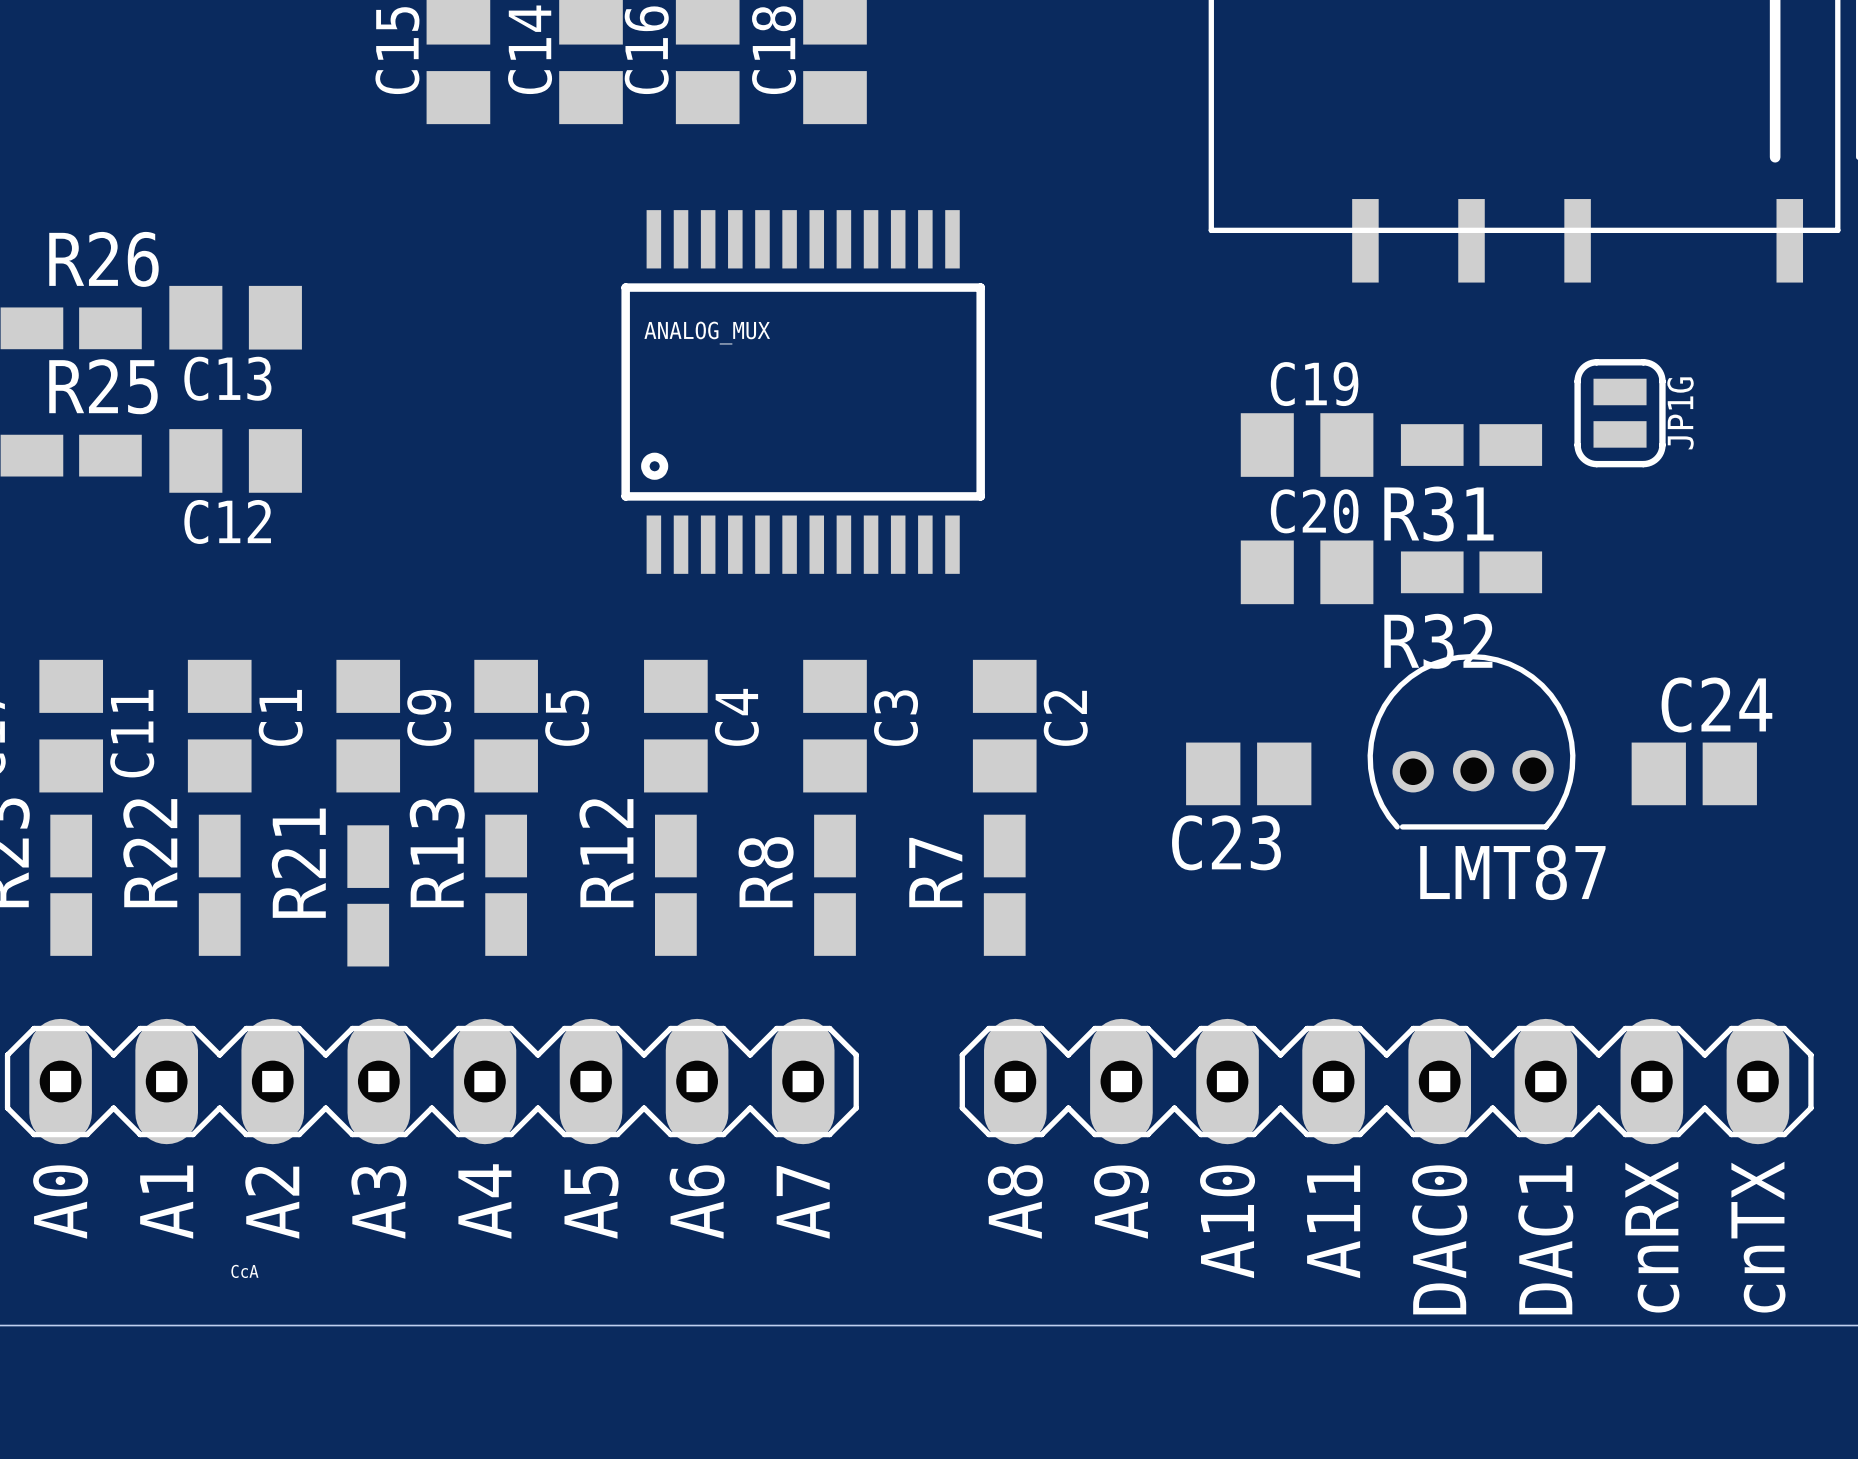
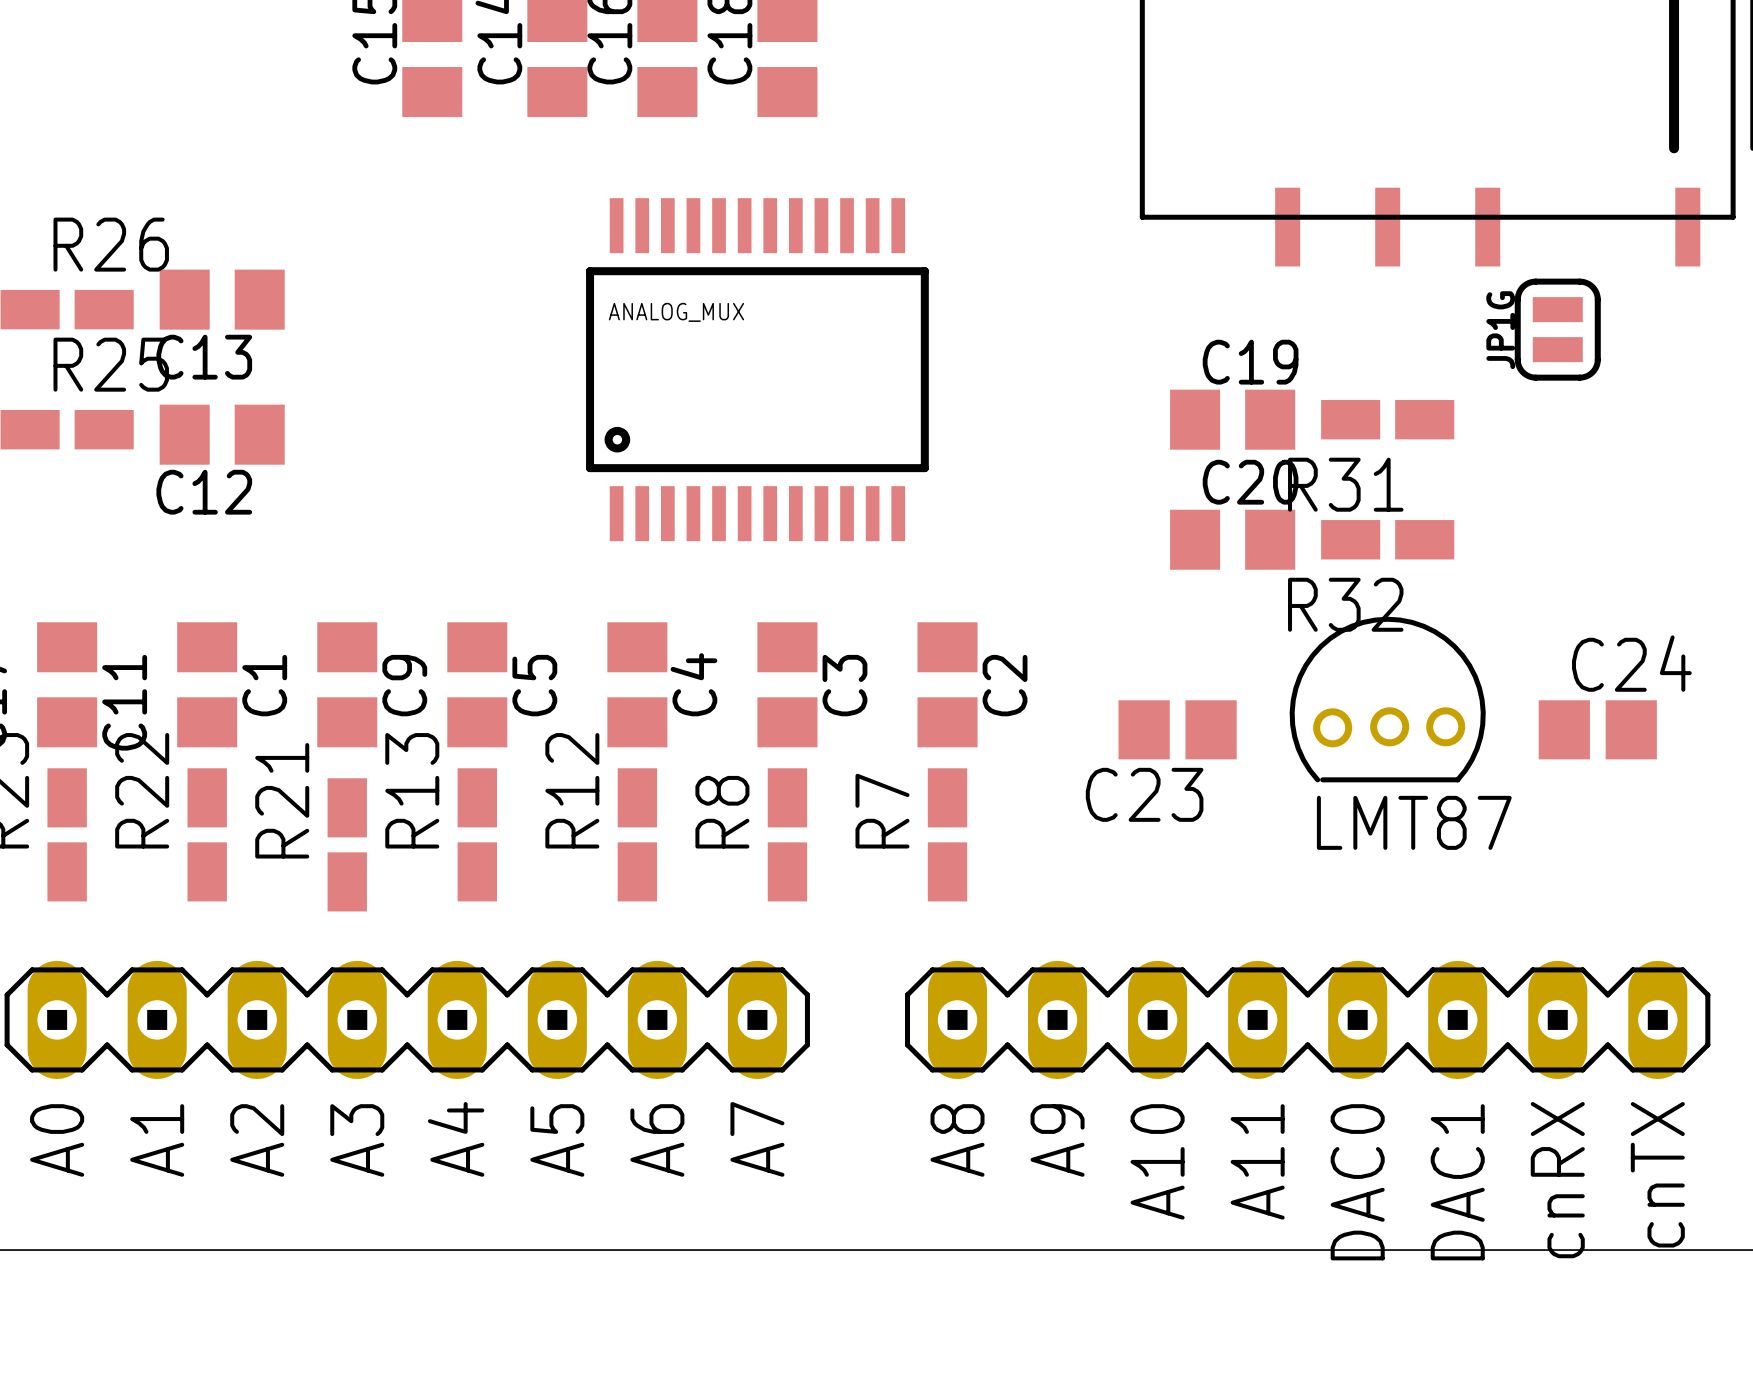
JP1G position: (1620, 413) -> (1557, 329)
JP1G name position: JP1G (1680, 413) -> JP1G (1500, 330)
text: CcA (244, 1271) -> none

